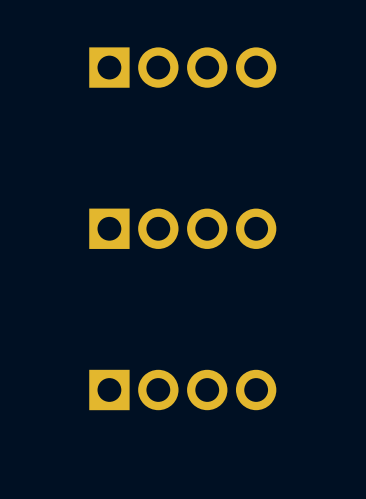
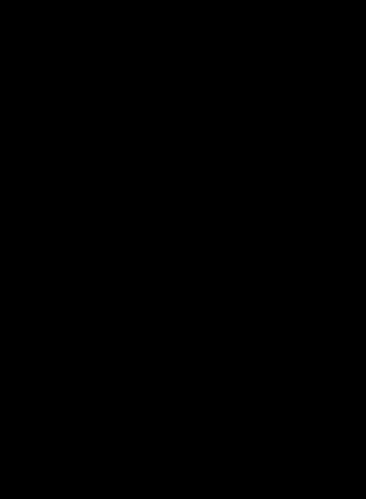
part: (182, 67) -> none
part: (182, 228) -> none
part: (182, 389) -> none

